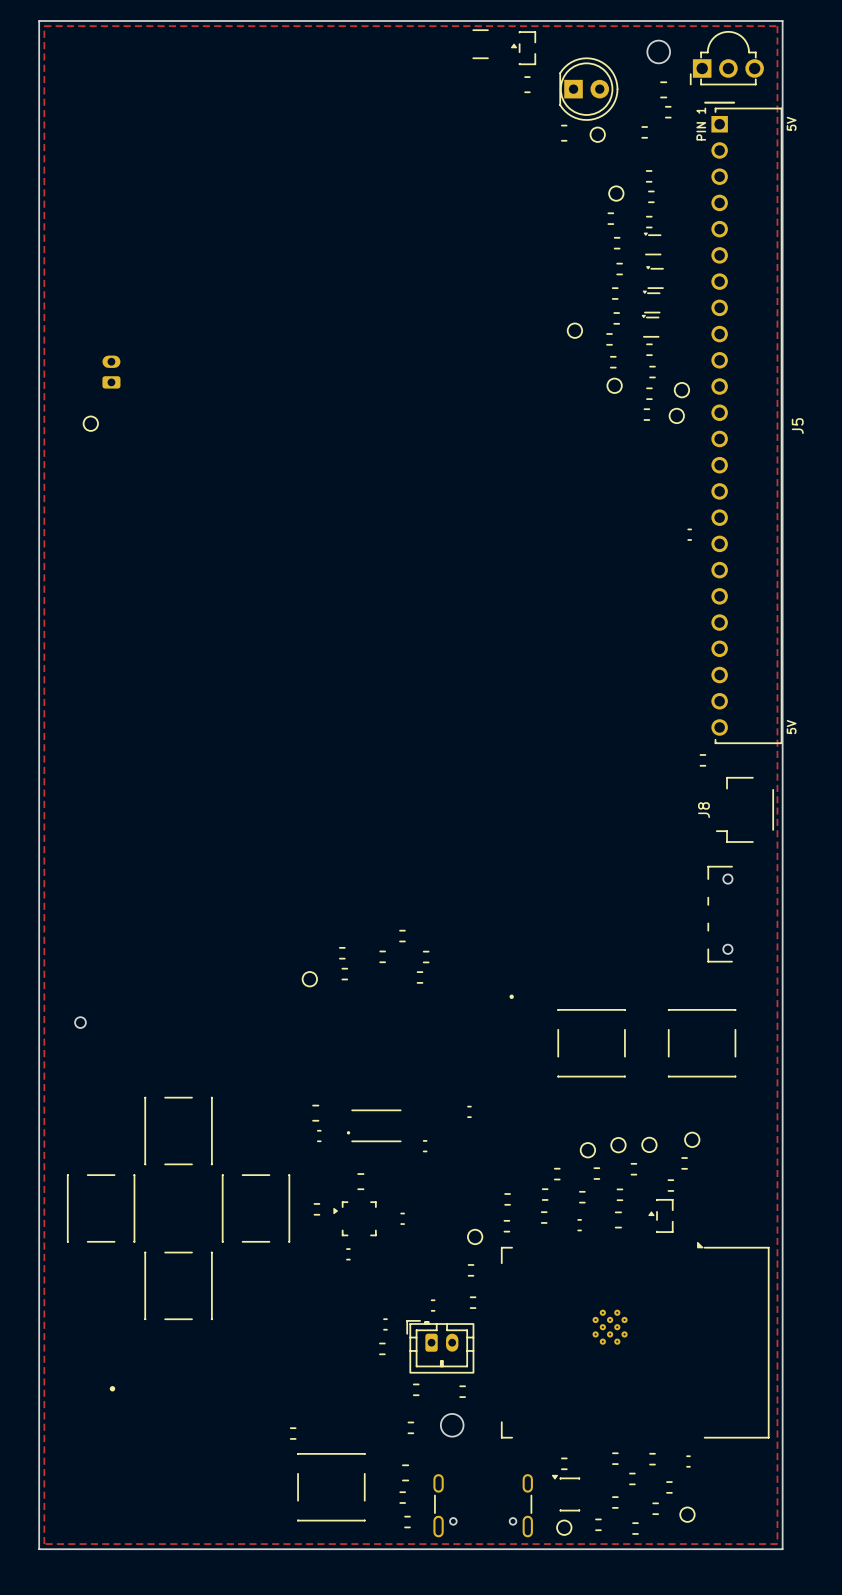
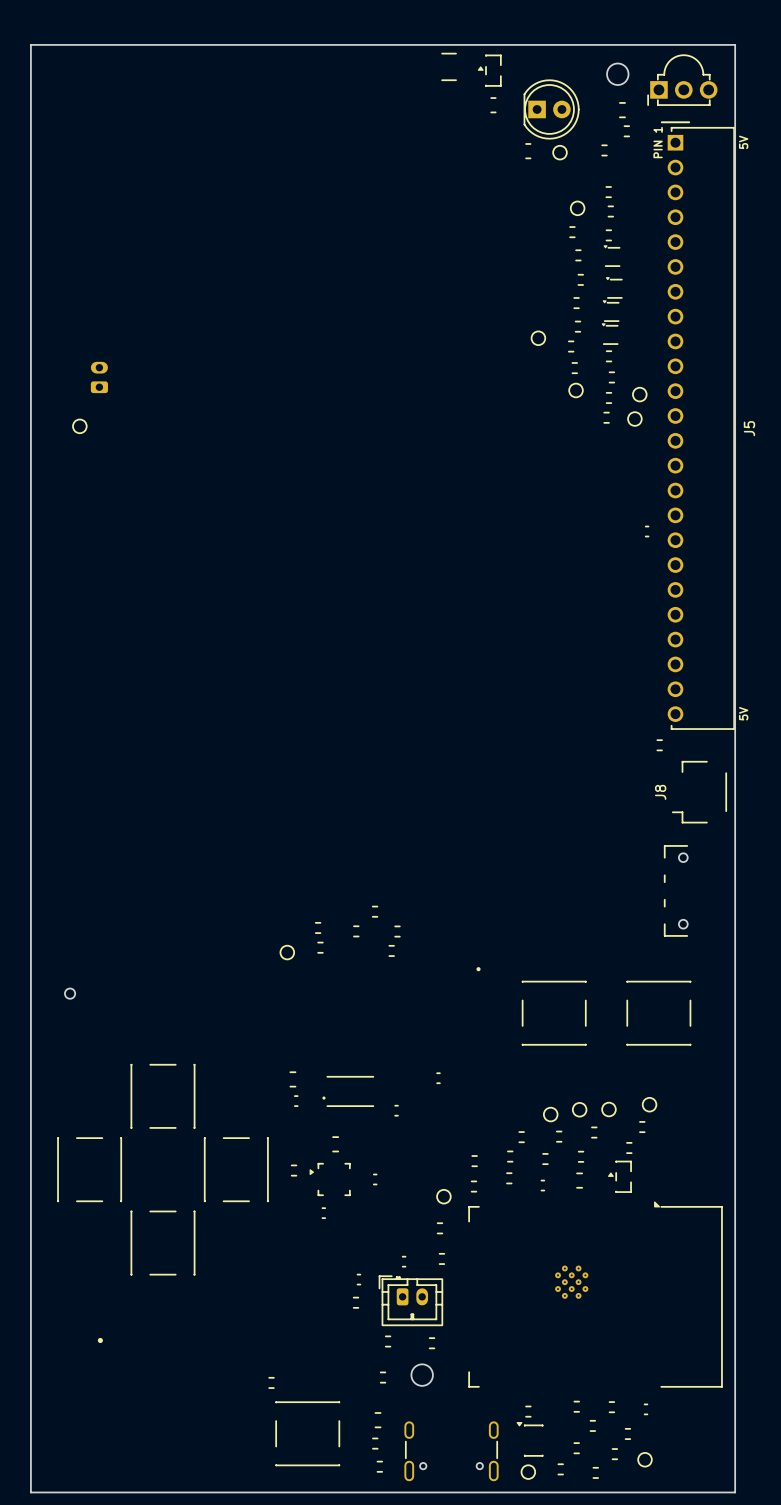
zone outline: (44, 26) (777, 26) (777, 1544) (44, 1544) (44, 26) -> none

